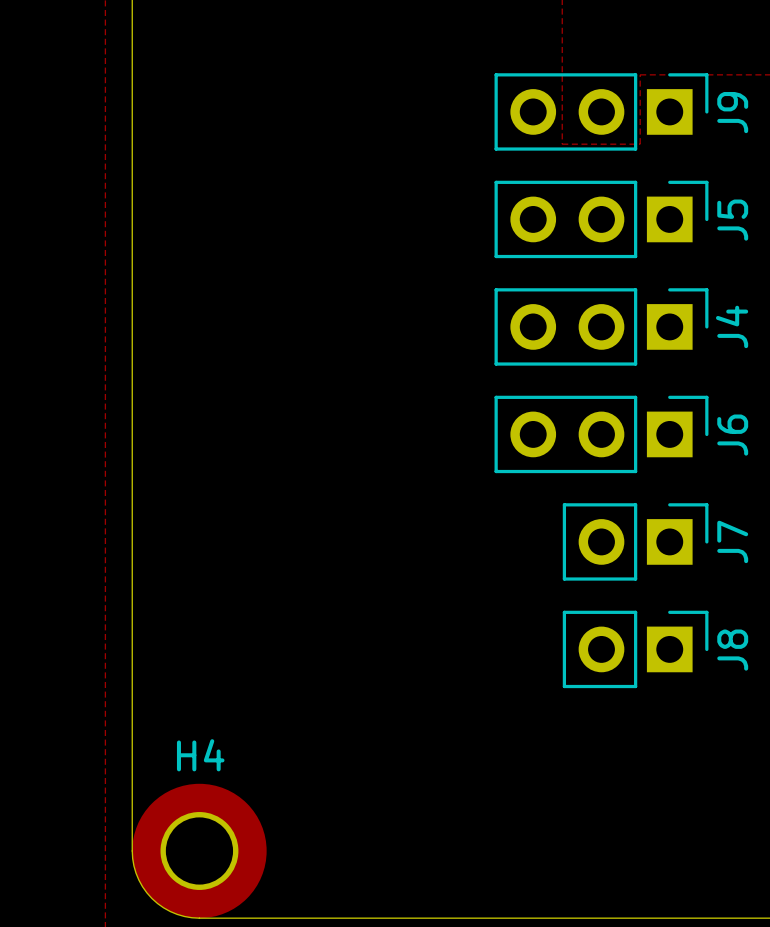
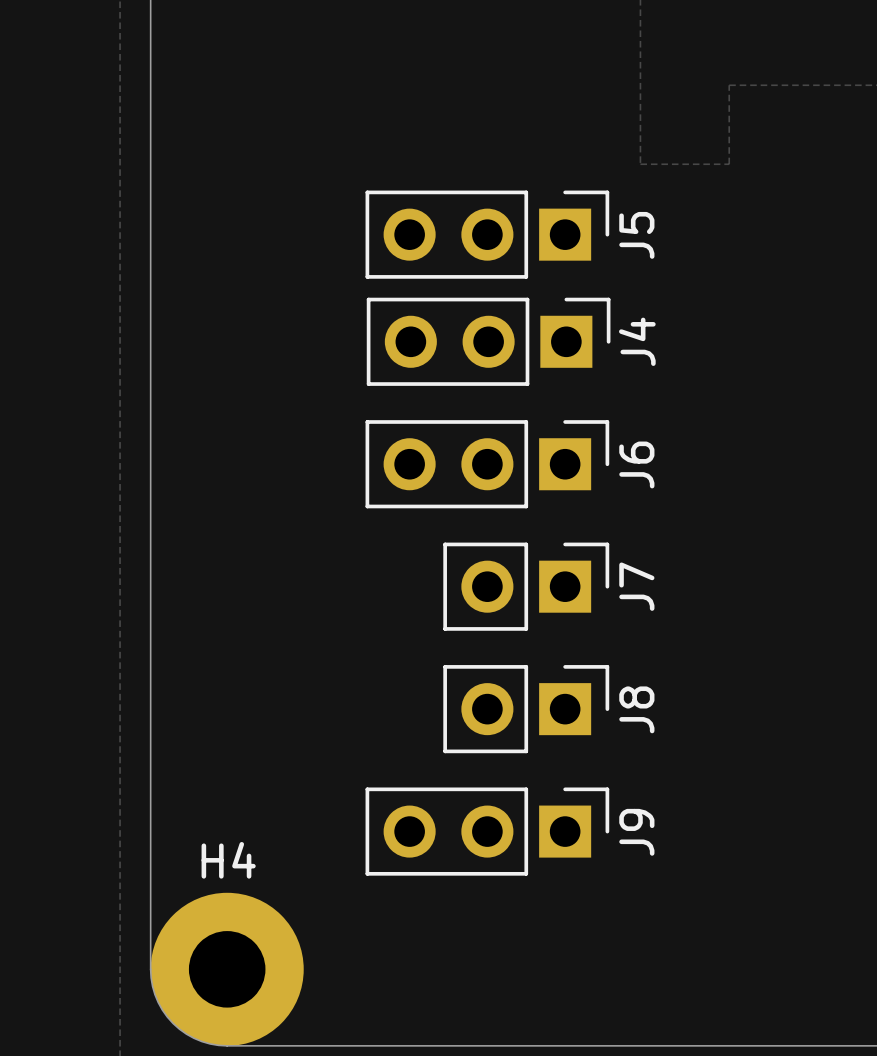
J9 position: (601, 111) -> (487, 831)
J5 position: (601, 219) -> (487, 234)
J4 position: (601, 326) -> (488, 341)
J6 position: (601, 434) -> (487, 464)
J7 position: (635, 541) -> (526, 586)
J8 position: (635, 649) -> (526, 709)

